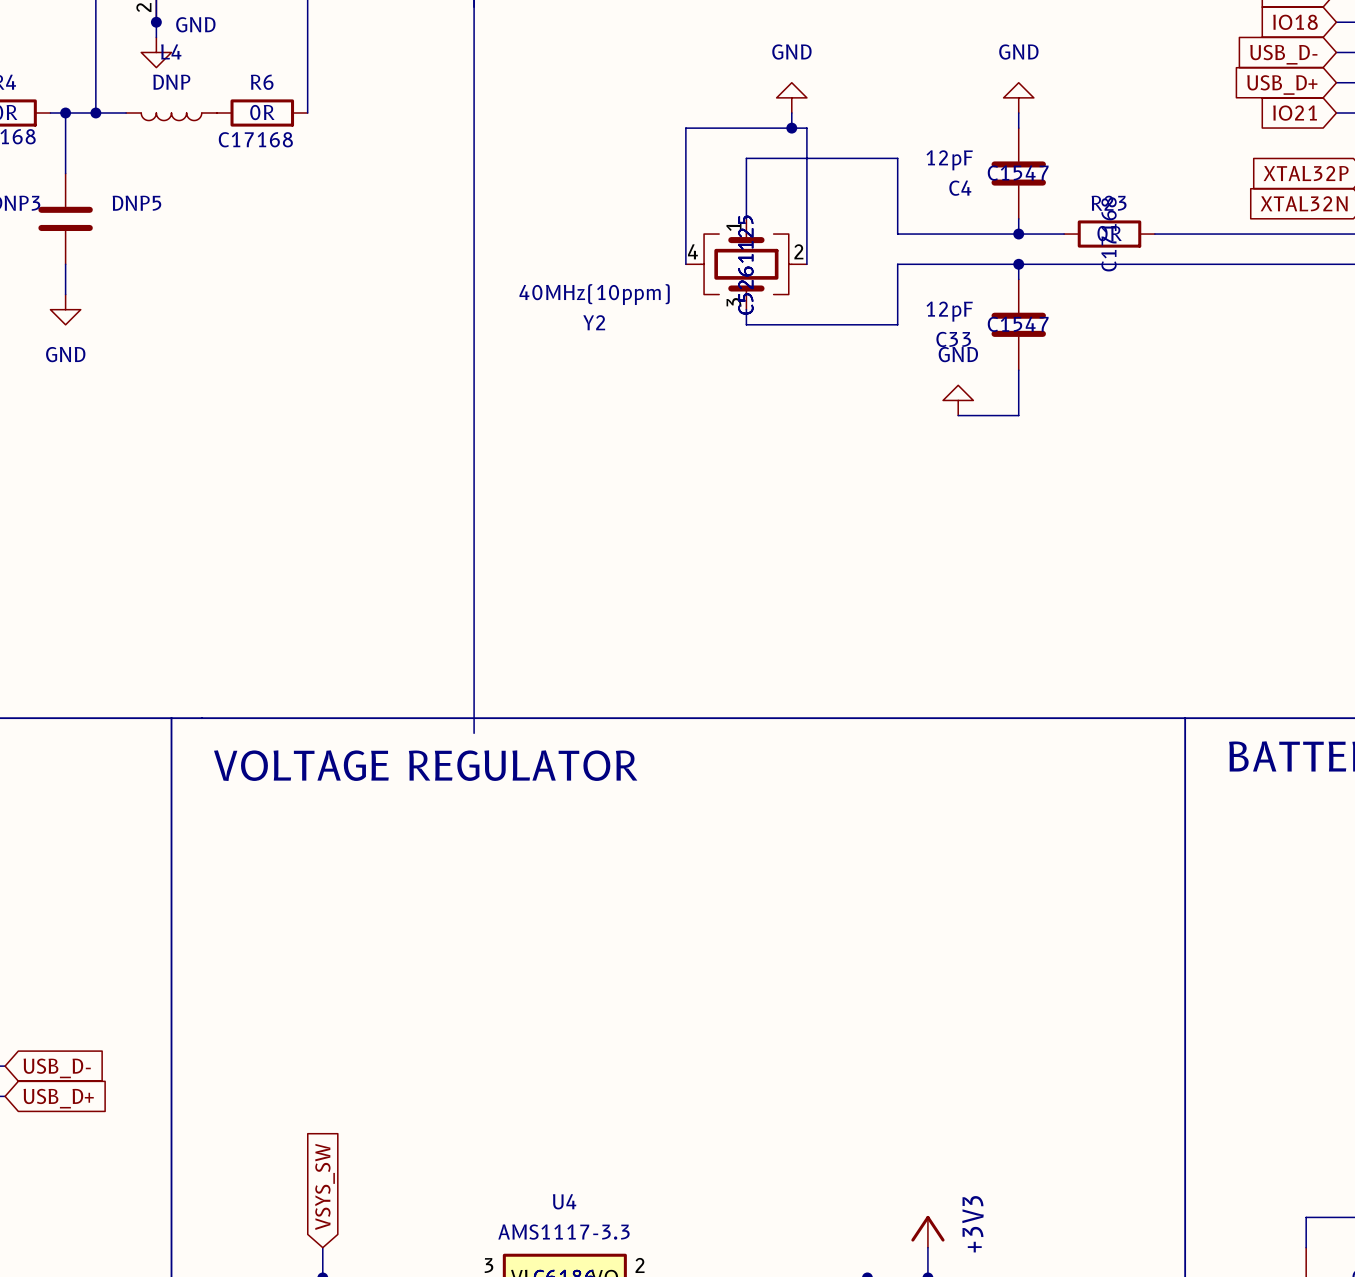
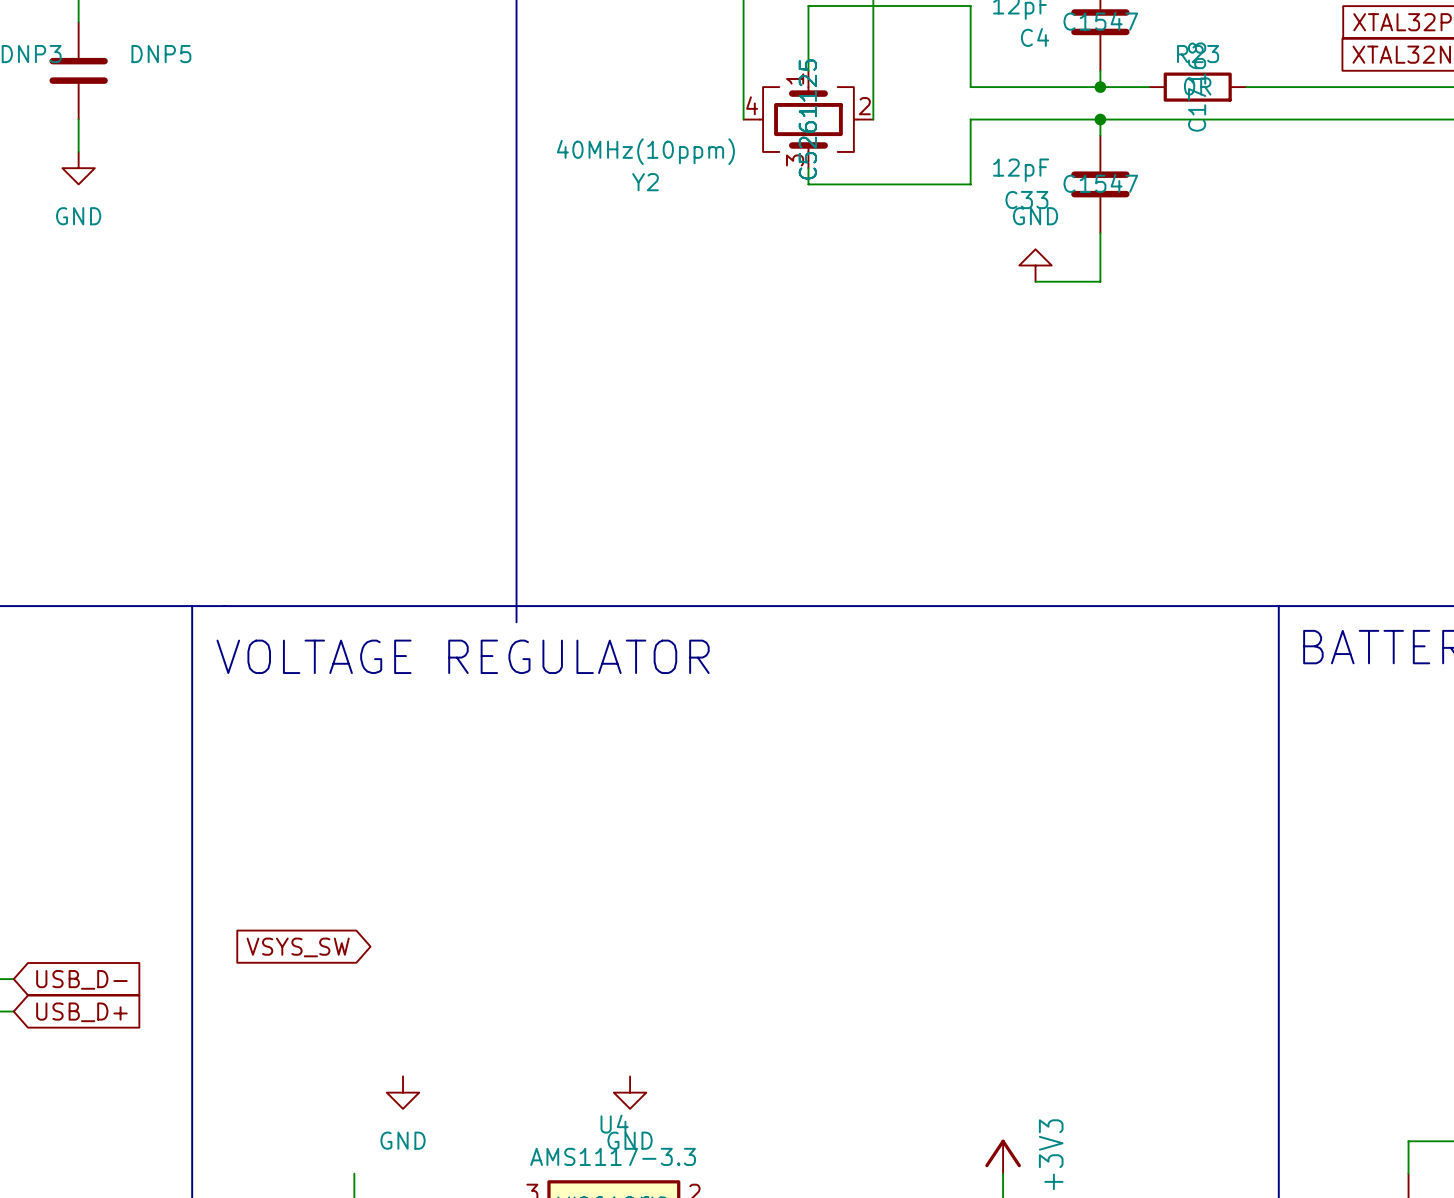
power symbol: none -> GND (403, 1092)
power symbol: none -> GND (630, 1092)
global label rotation: 0° (325, 1186) -> 90° counterclockwise (298, 947)

